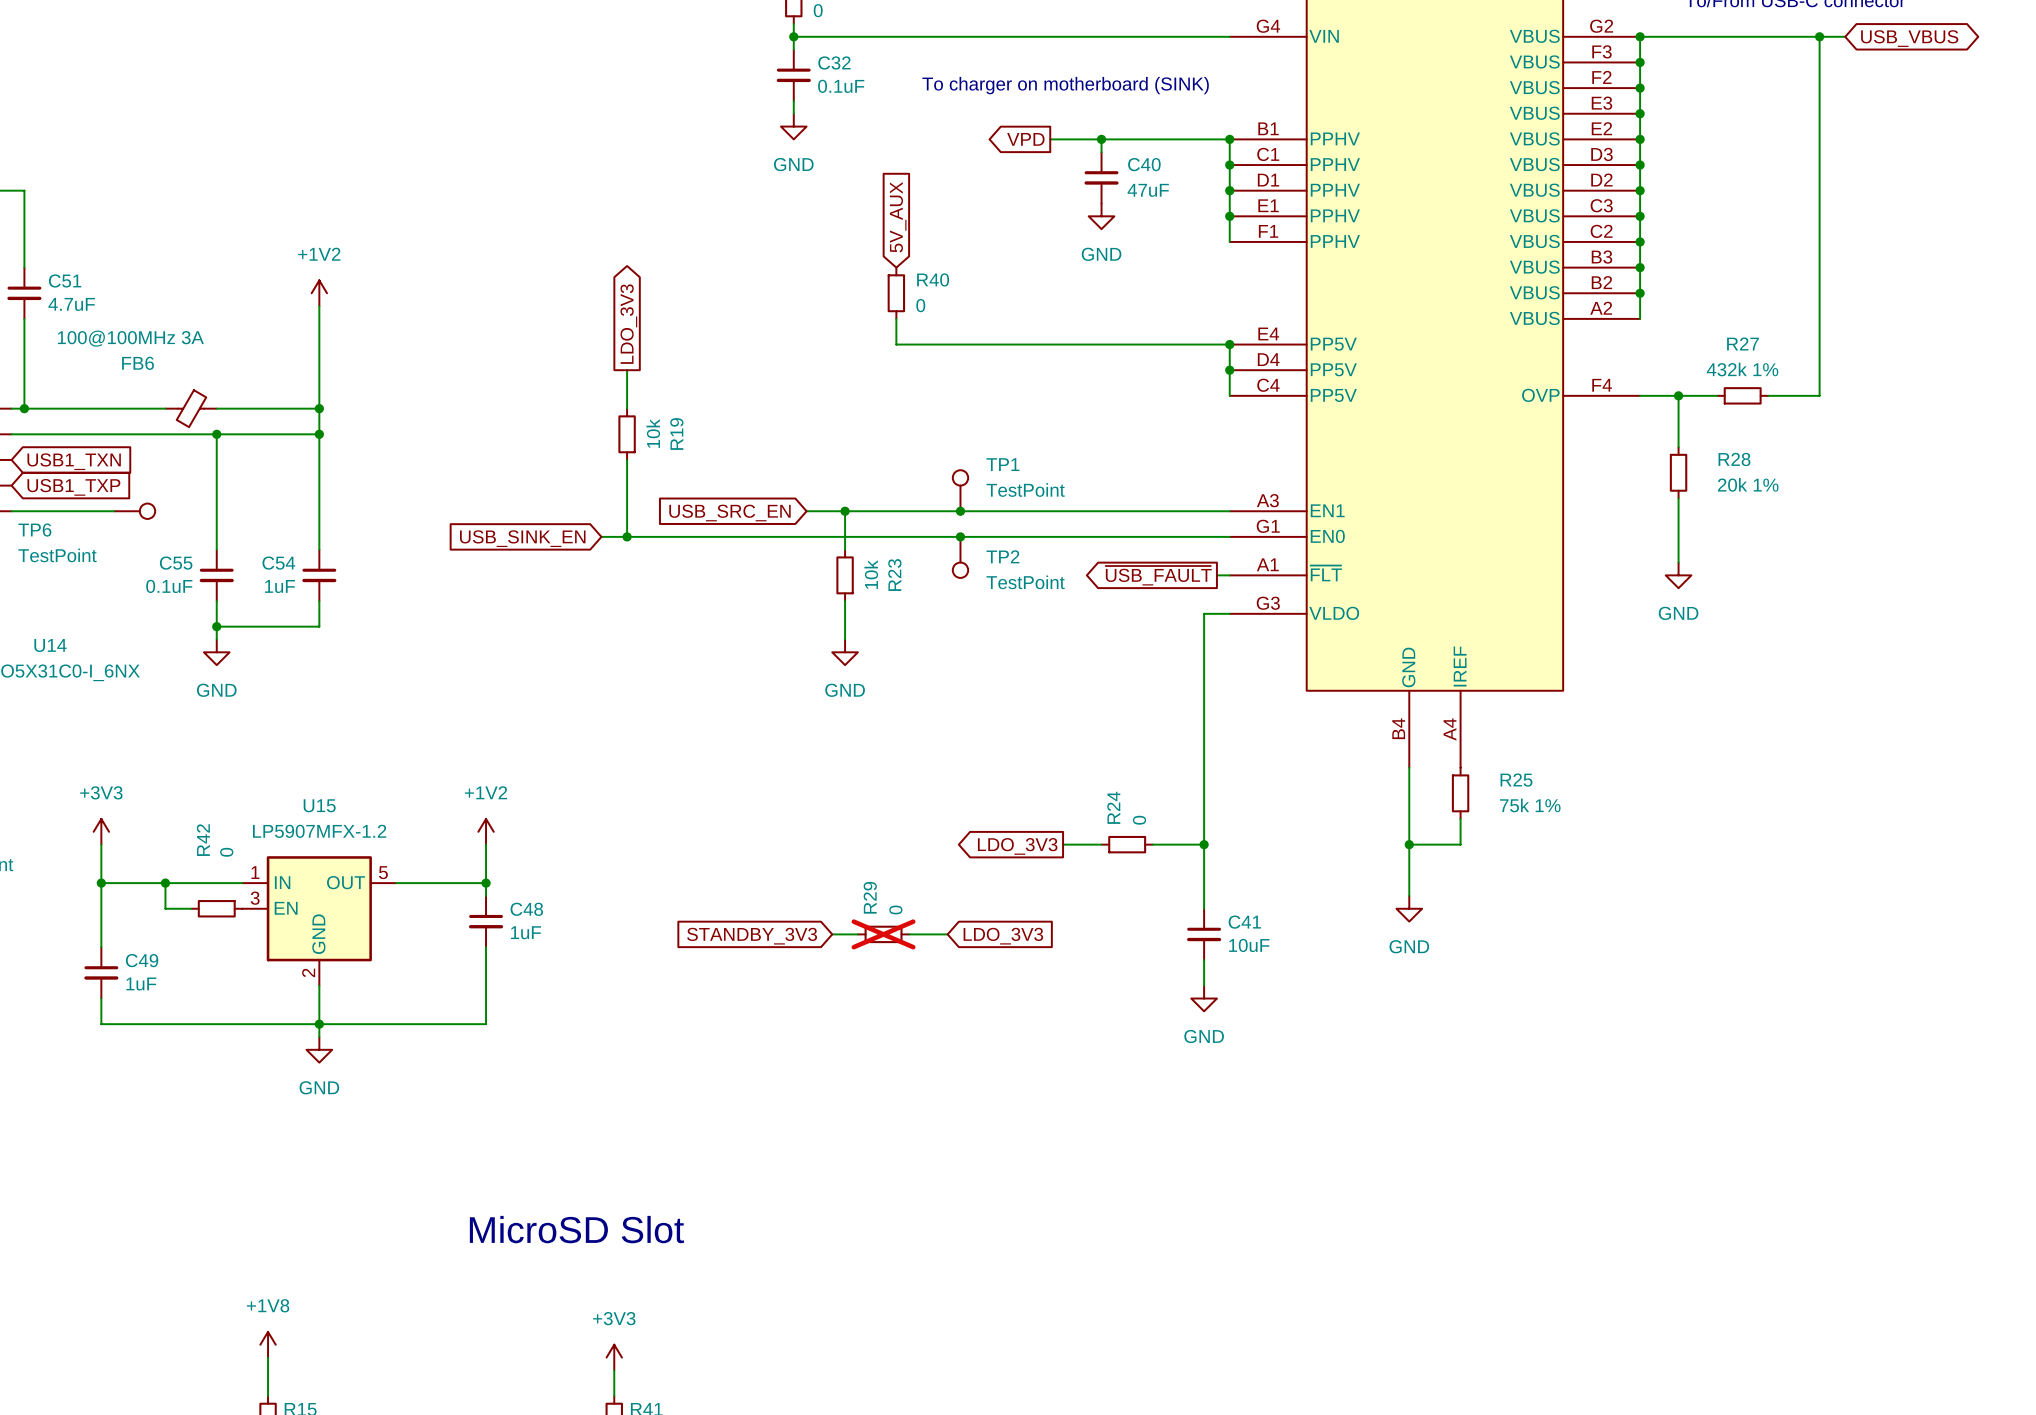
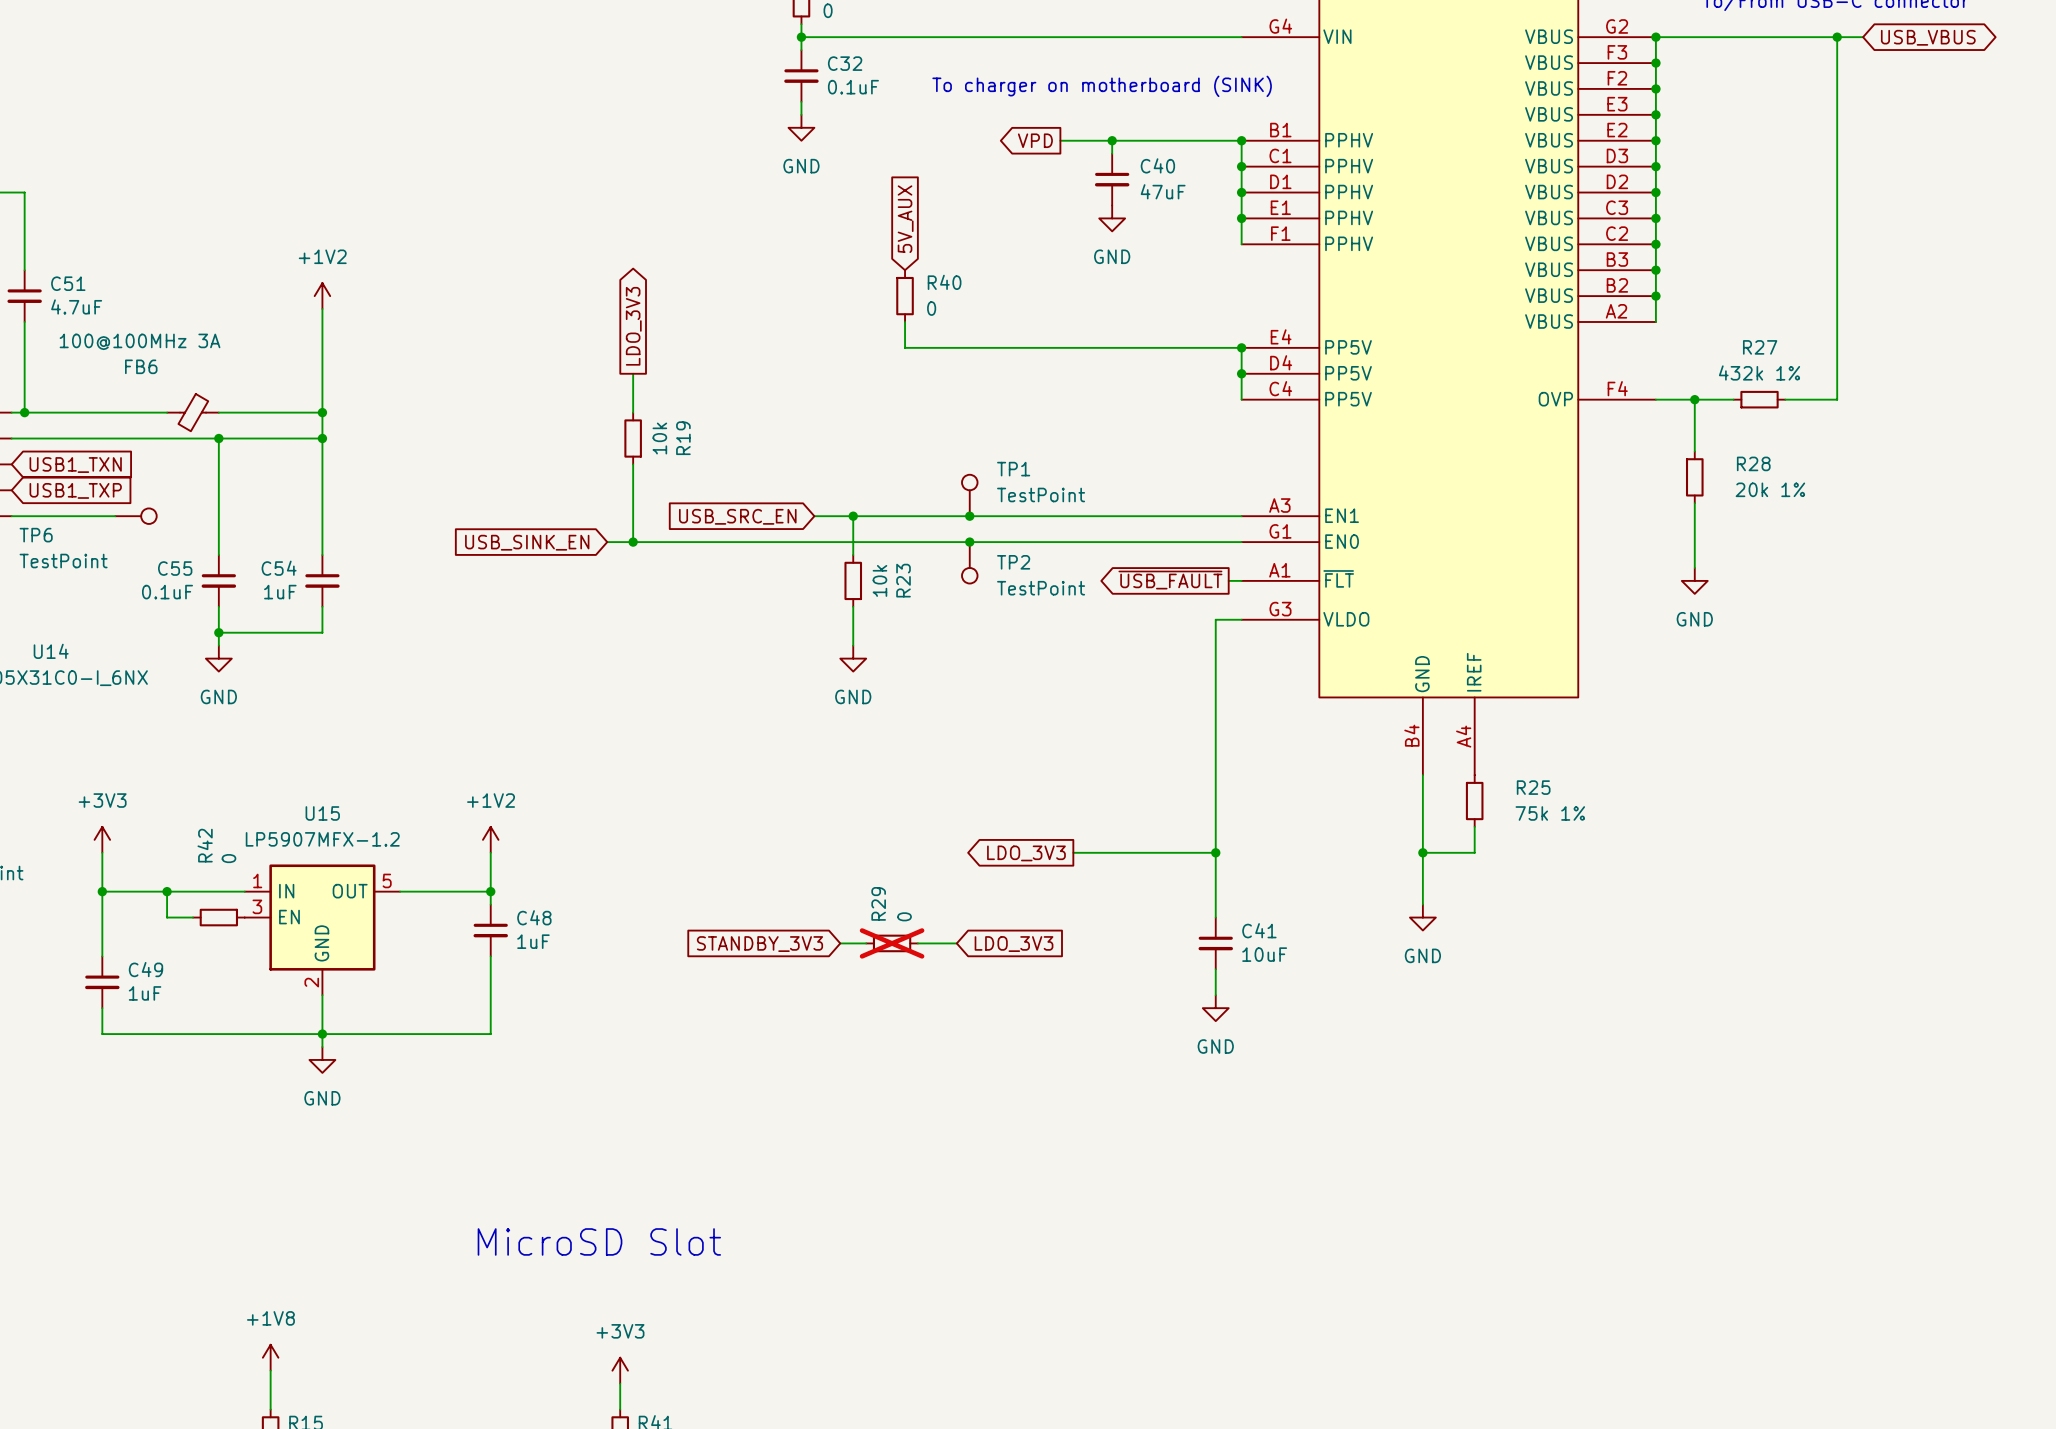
wire: none -> (1112, 852) (1163, 852)
R24: 0 (1127, 844) -> none

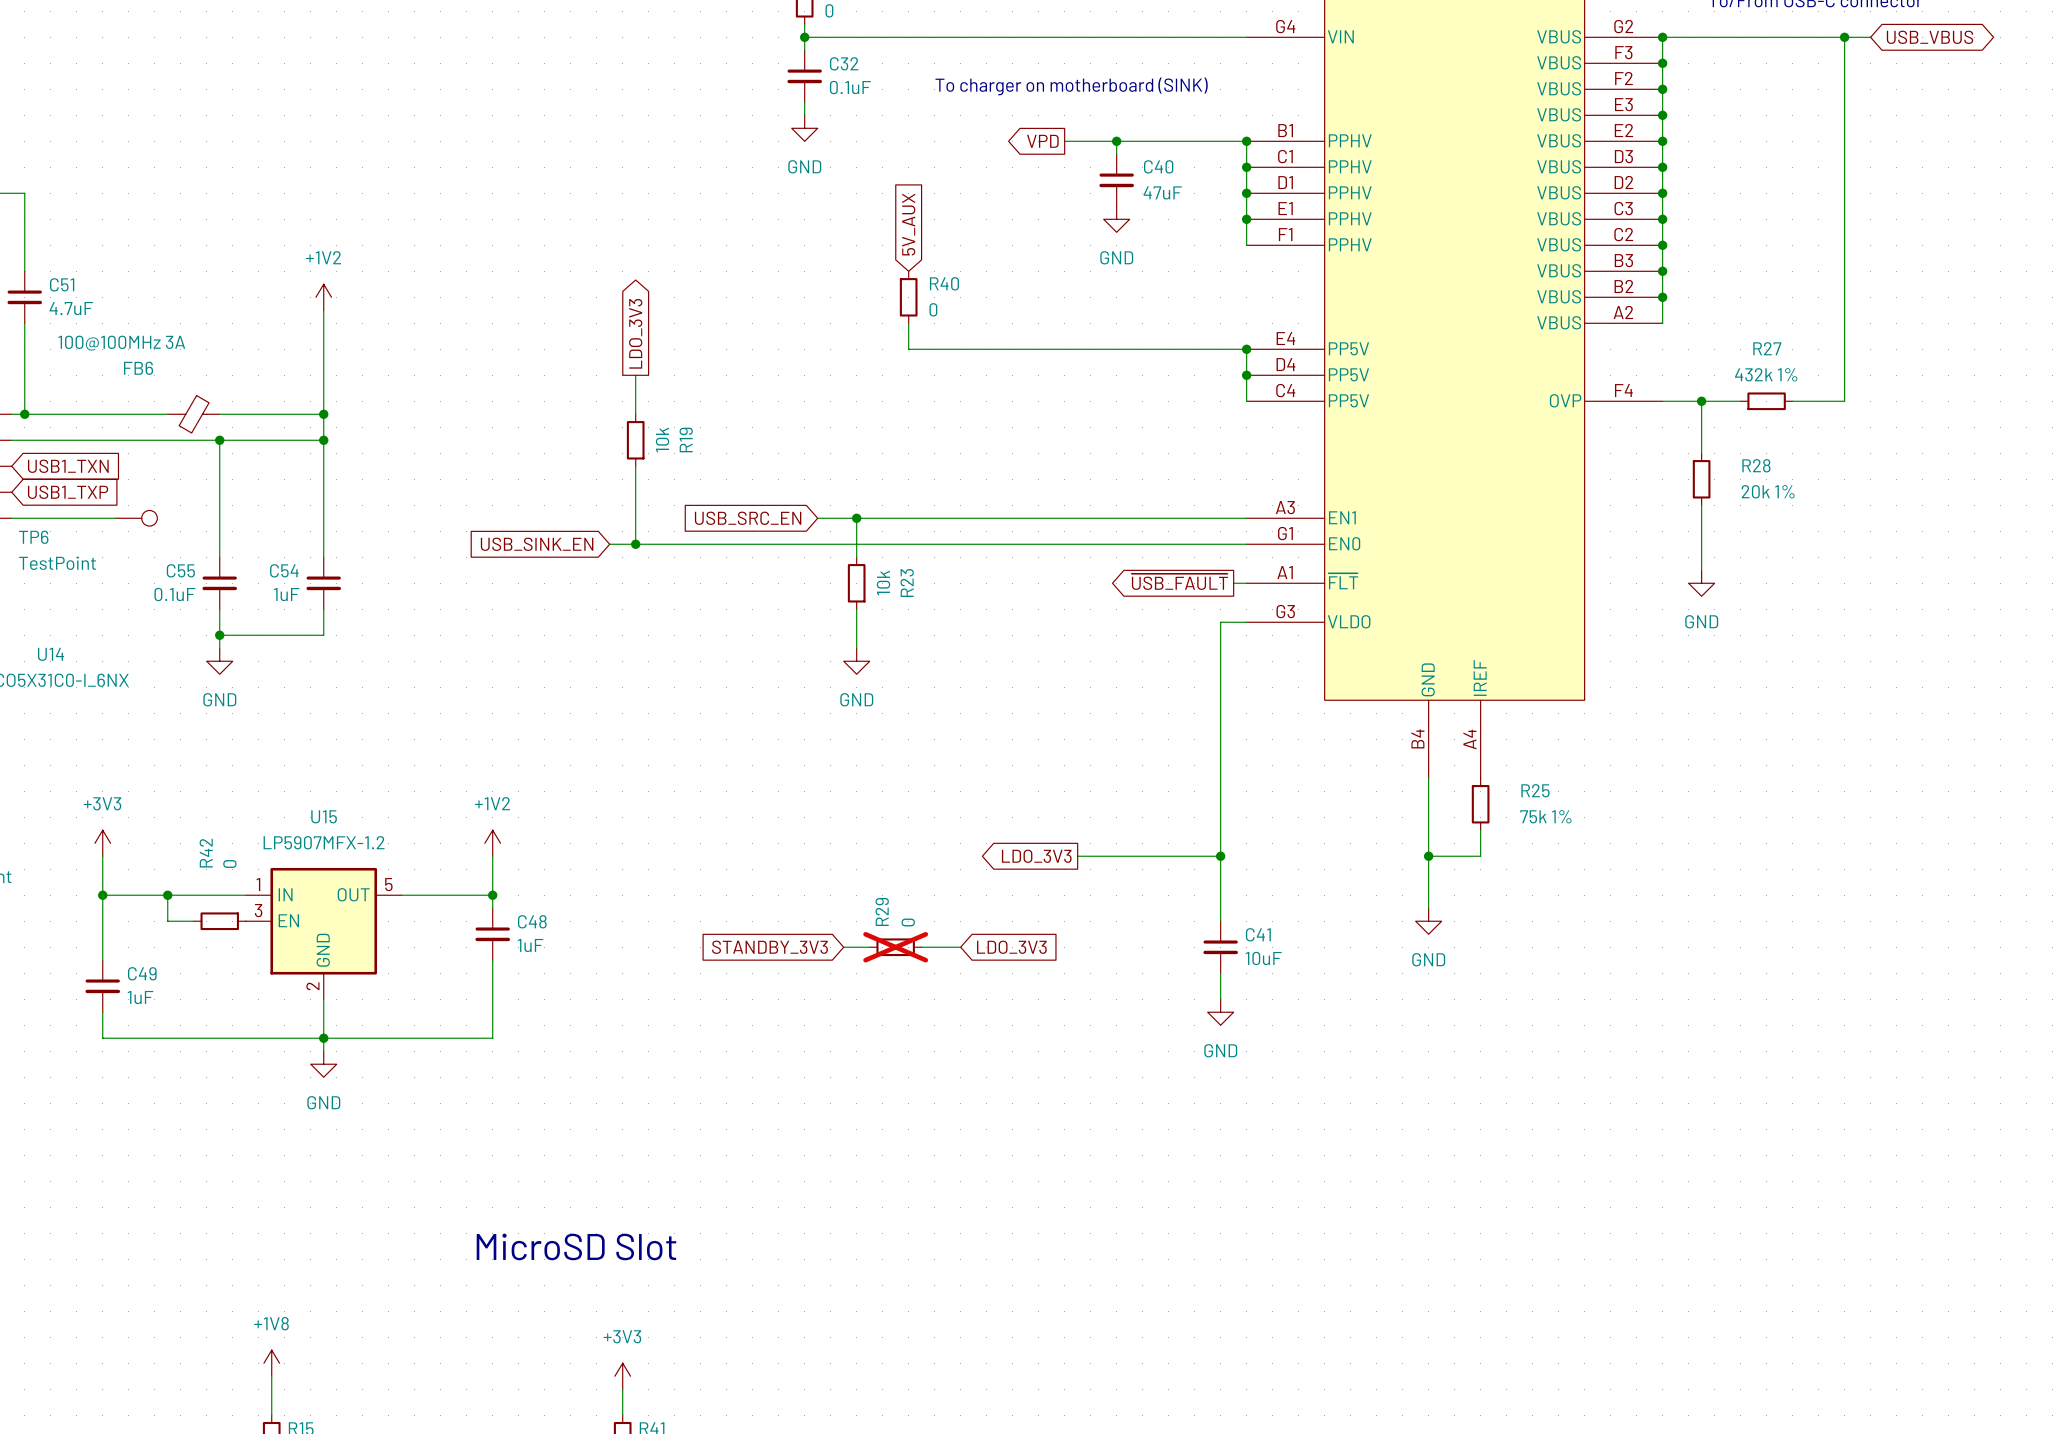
TP1: TestPoint (969, 495) -> none
junction: (969, 516) -> none
junction: (969, 542) -> none
TP2: TestPoint (969, 562) -> none

